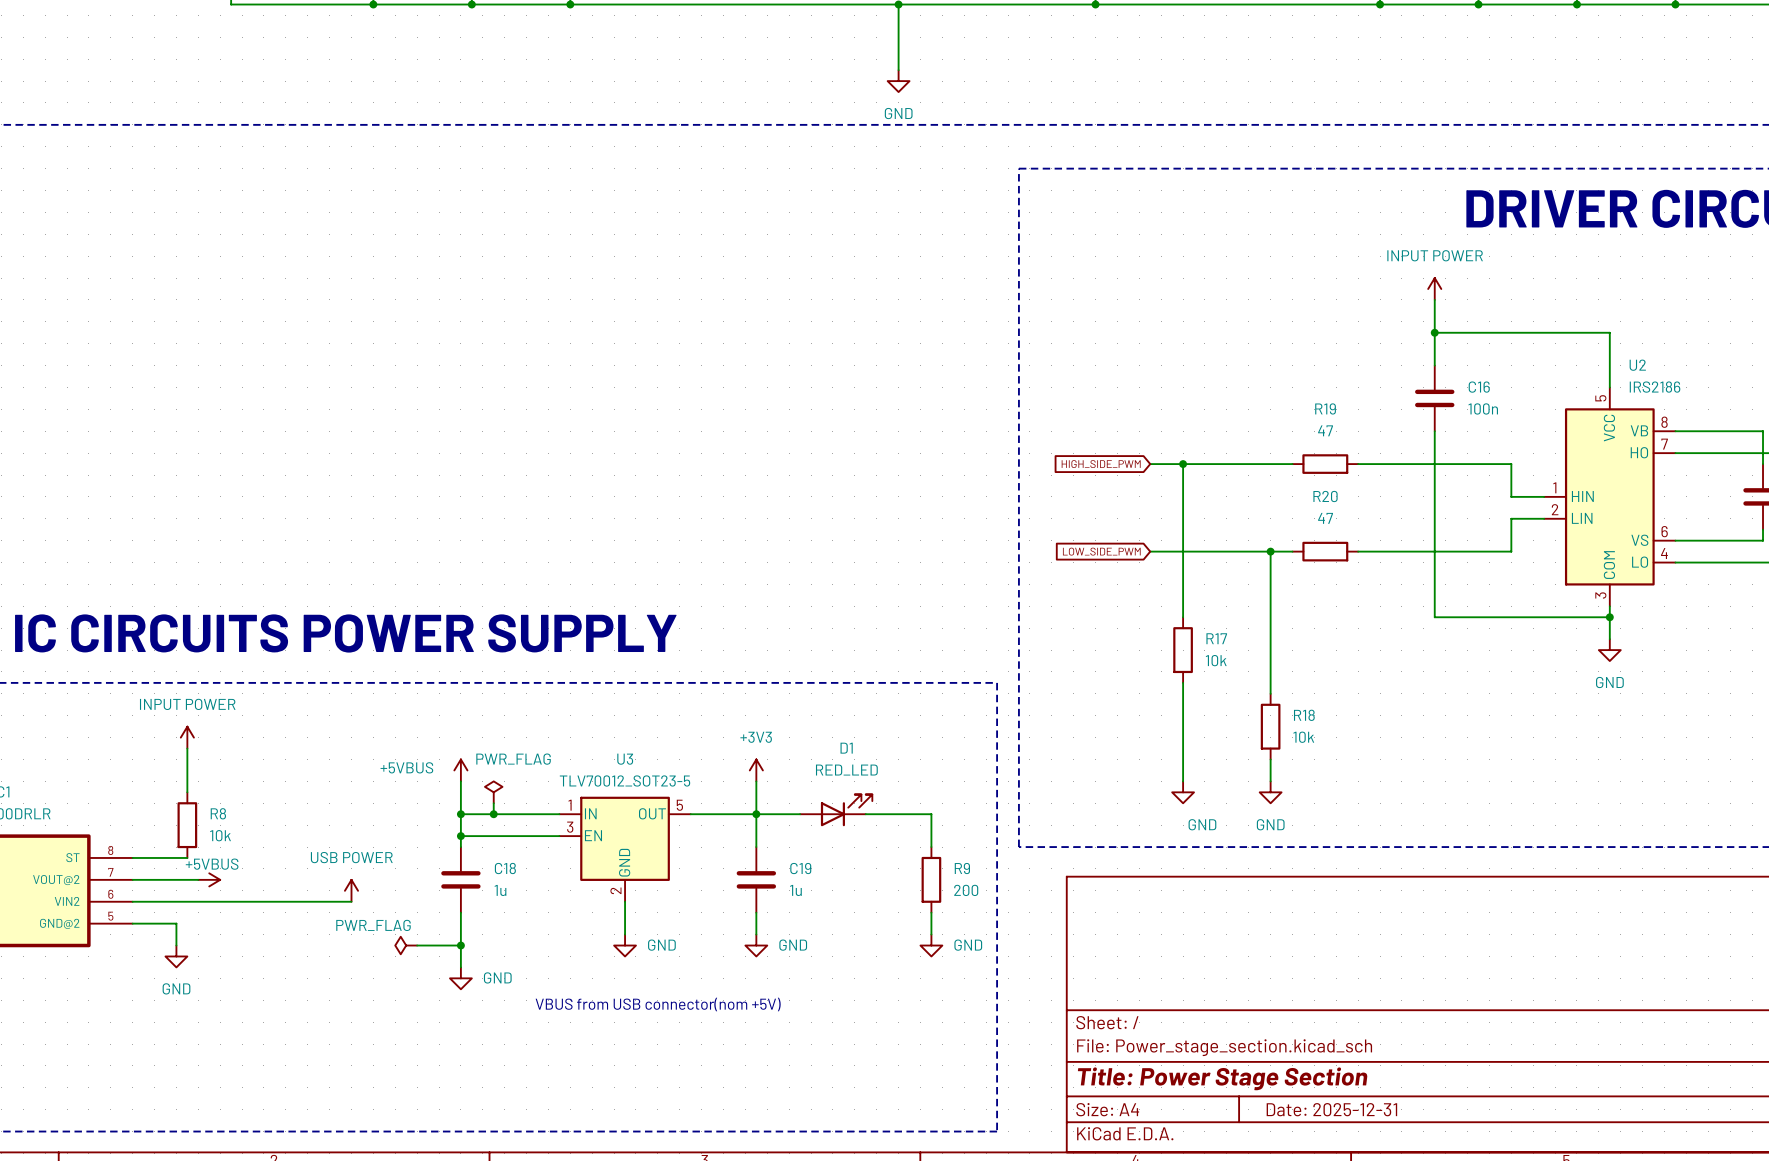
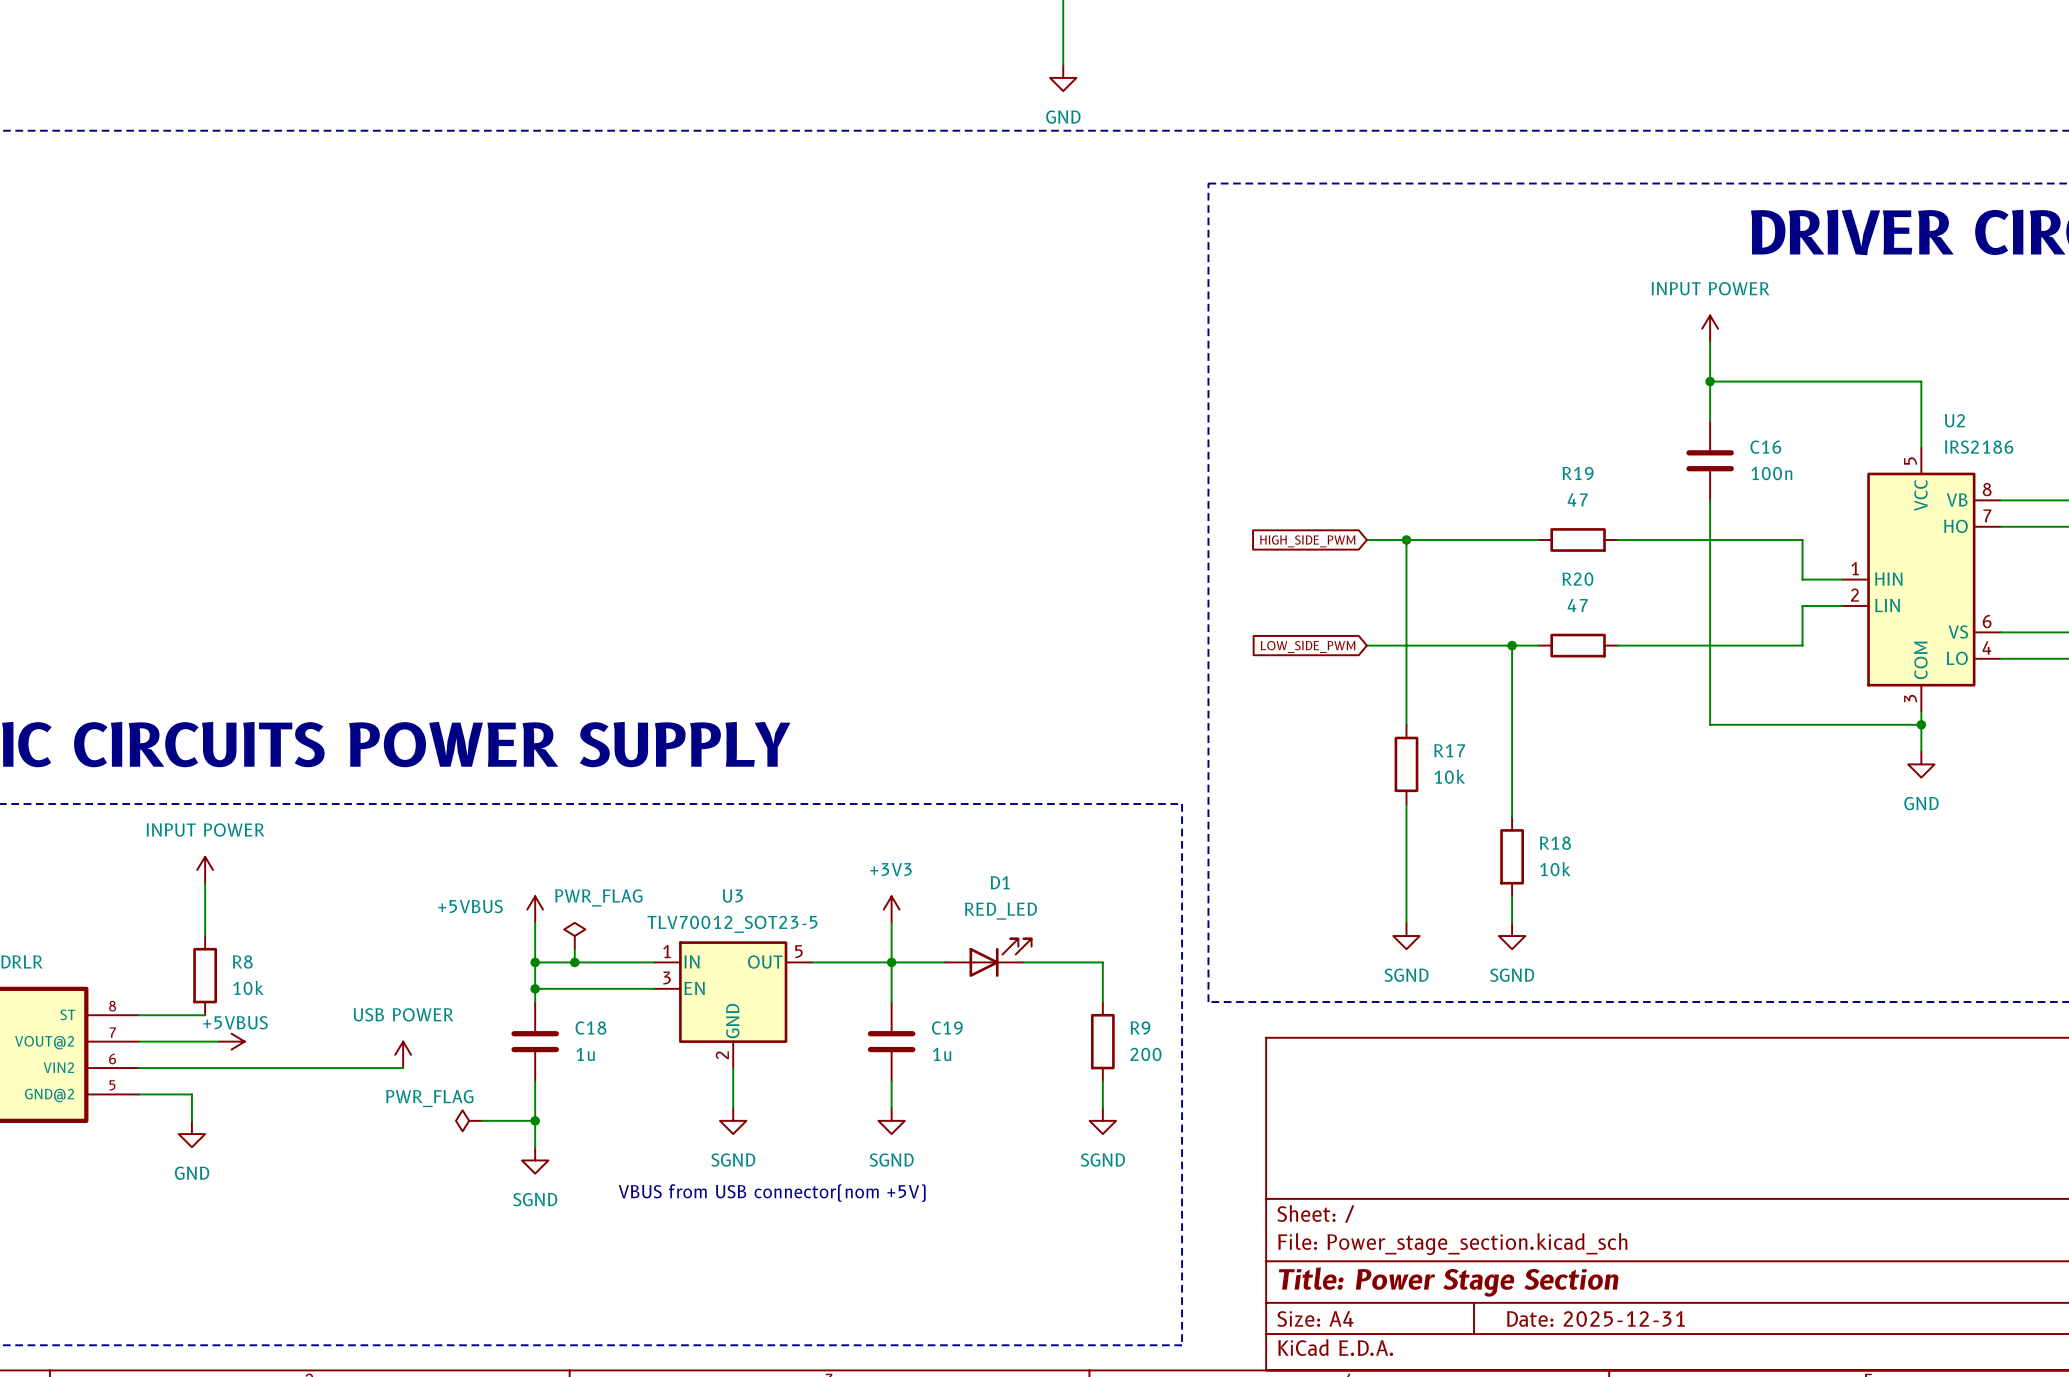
power symbol: GND (1183, 792) -> SGND (1406, 936)
power symbol: GND (1270, 792) -> SGND (1512, 936)
power symbol: GND (625, 945) -> SGND (733, 1120)
power symbol: GND (756, 945) -> SGND (891, 1120)
power symbol: GND (931, 945) -> SGND (1102, 1120)
power symbol: GND (460, 978) -> SGND (535, 1160)

